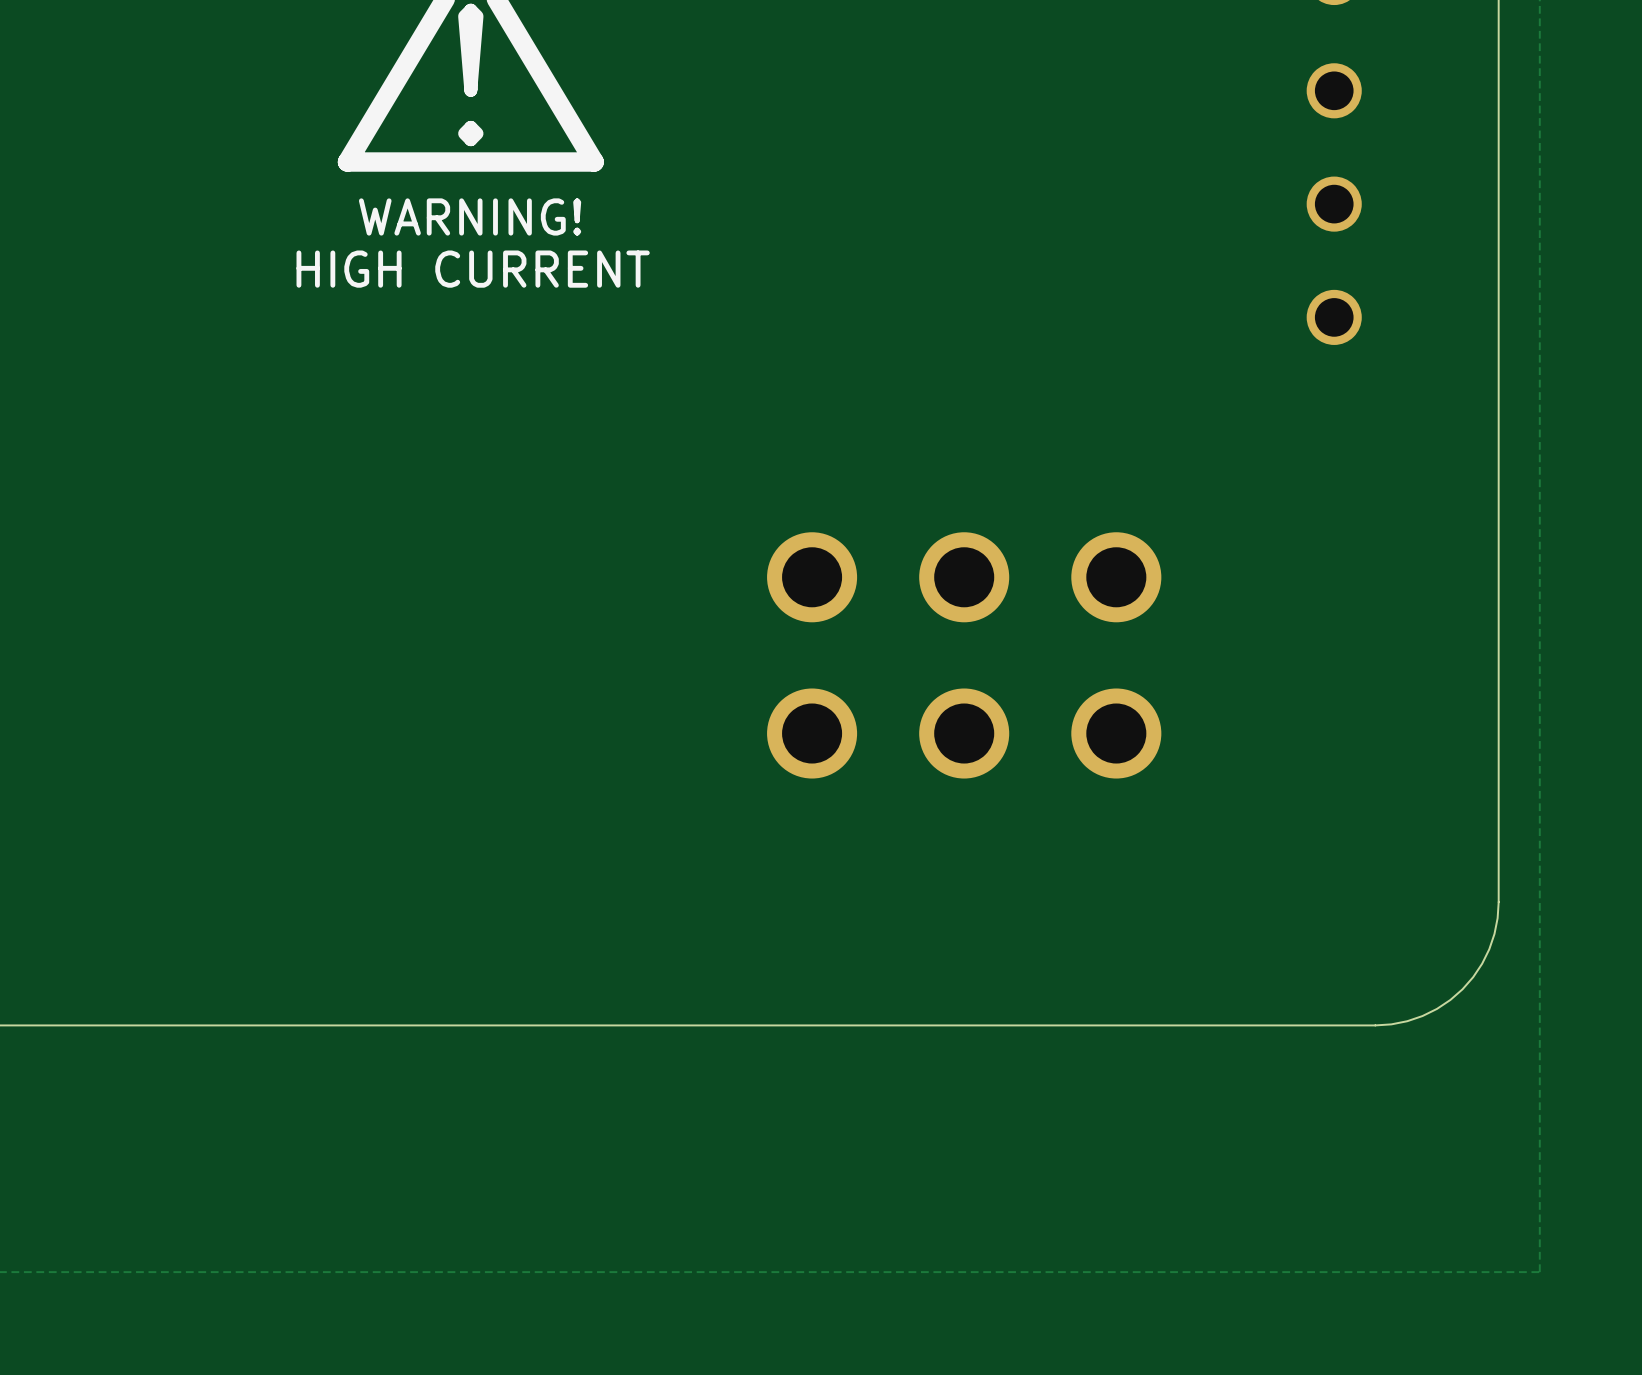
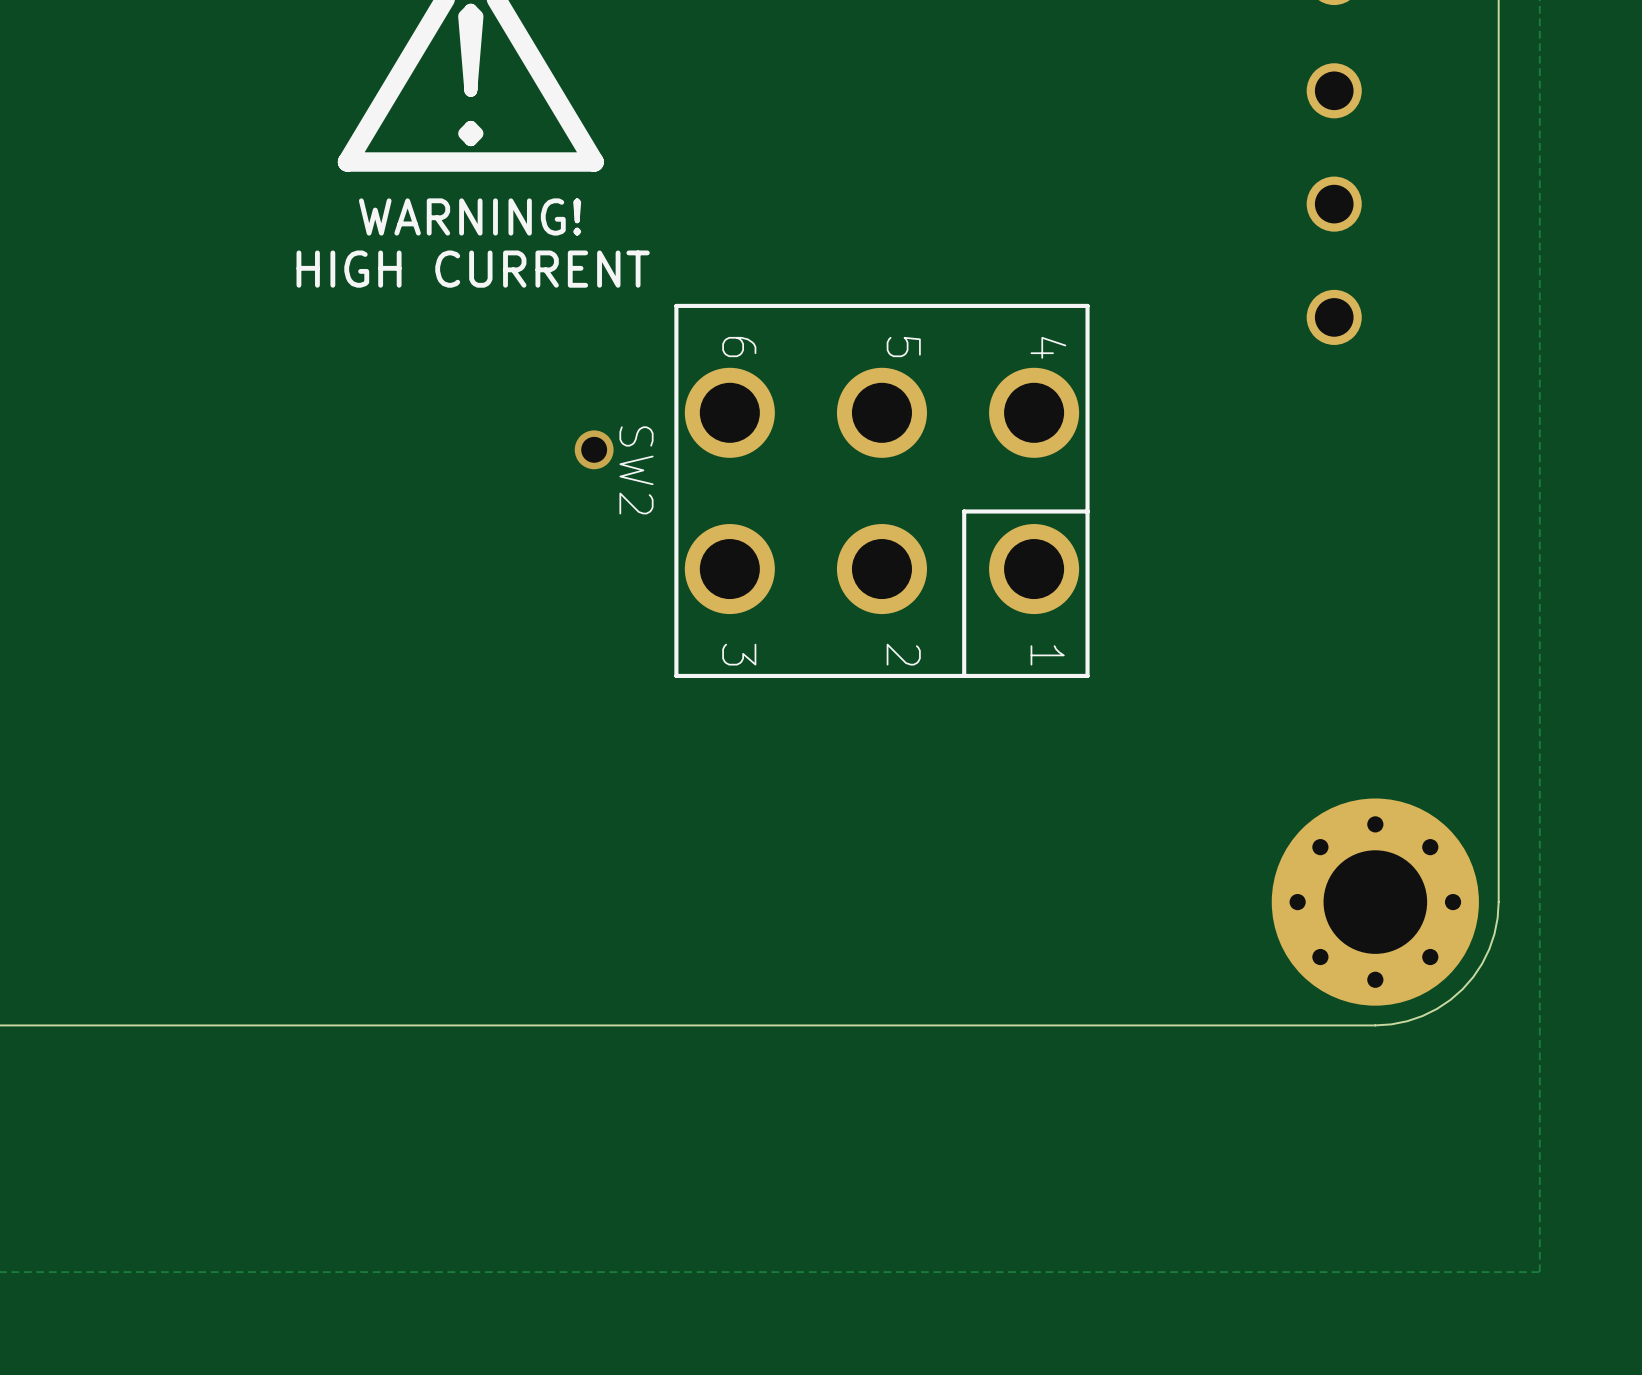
via: none -> (594, 449)
SW2 side: top (964, 655) -> bottom (881, 490)
part: none -> (1375, 902)

